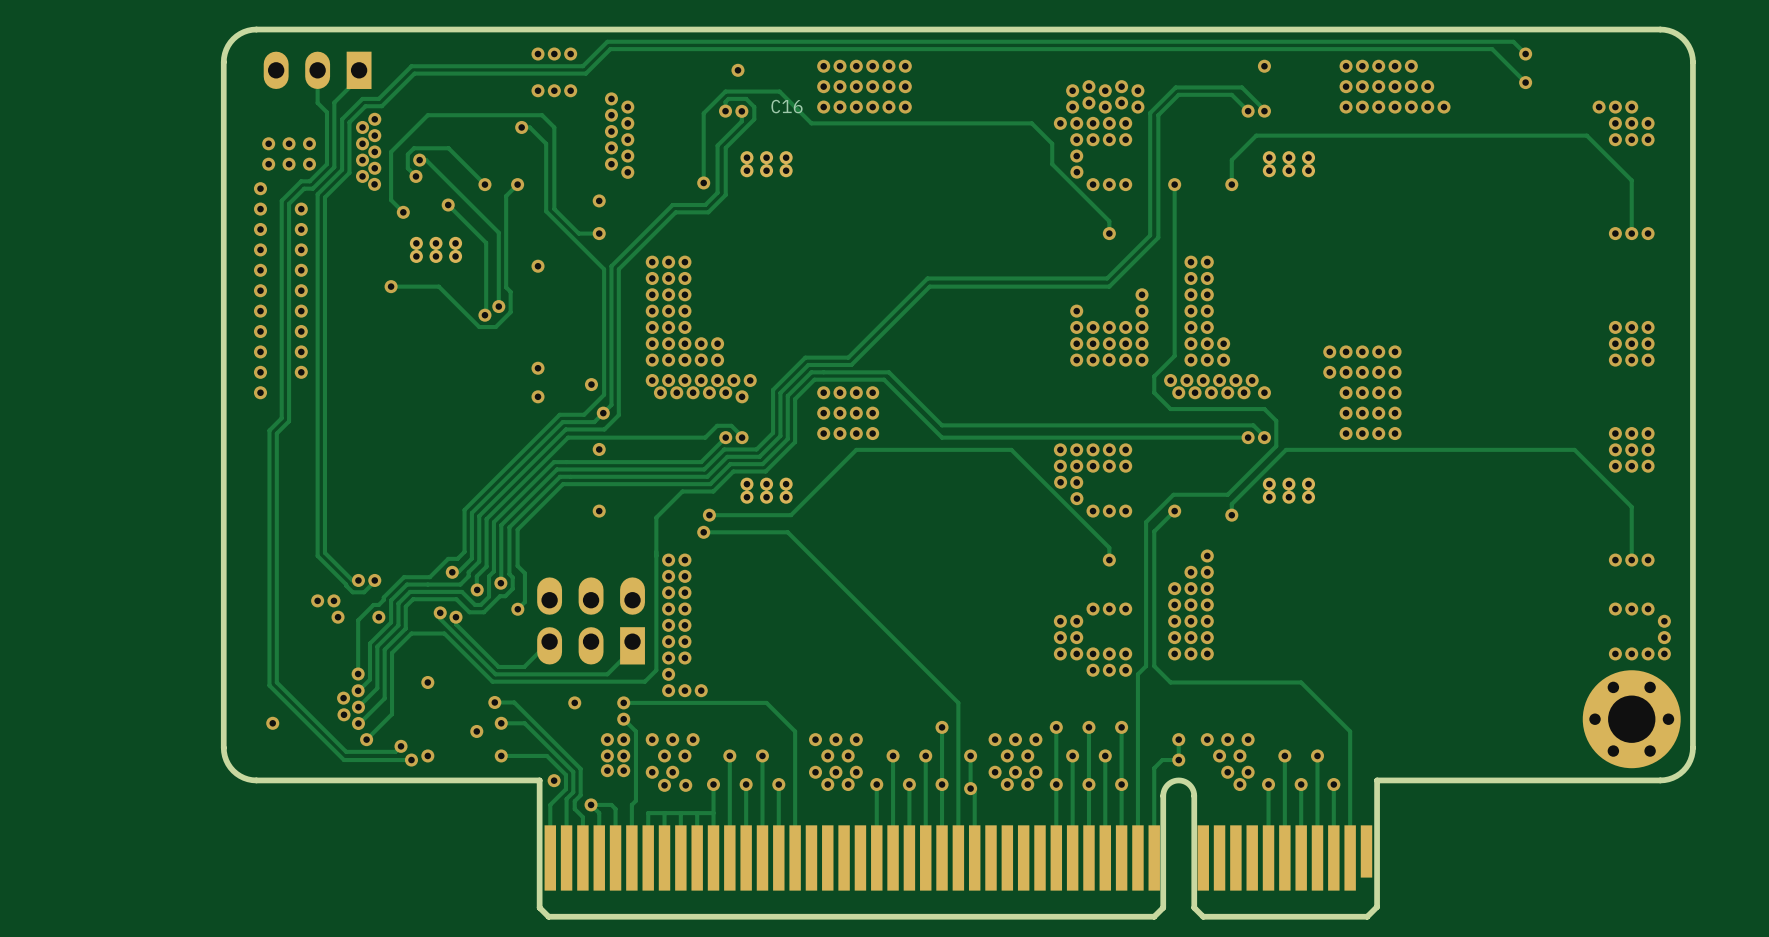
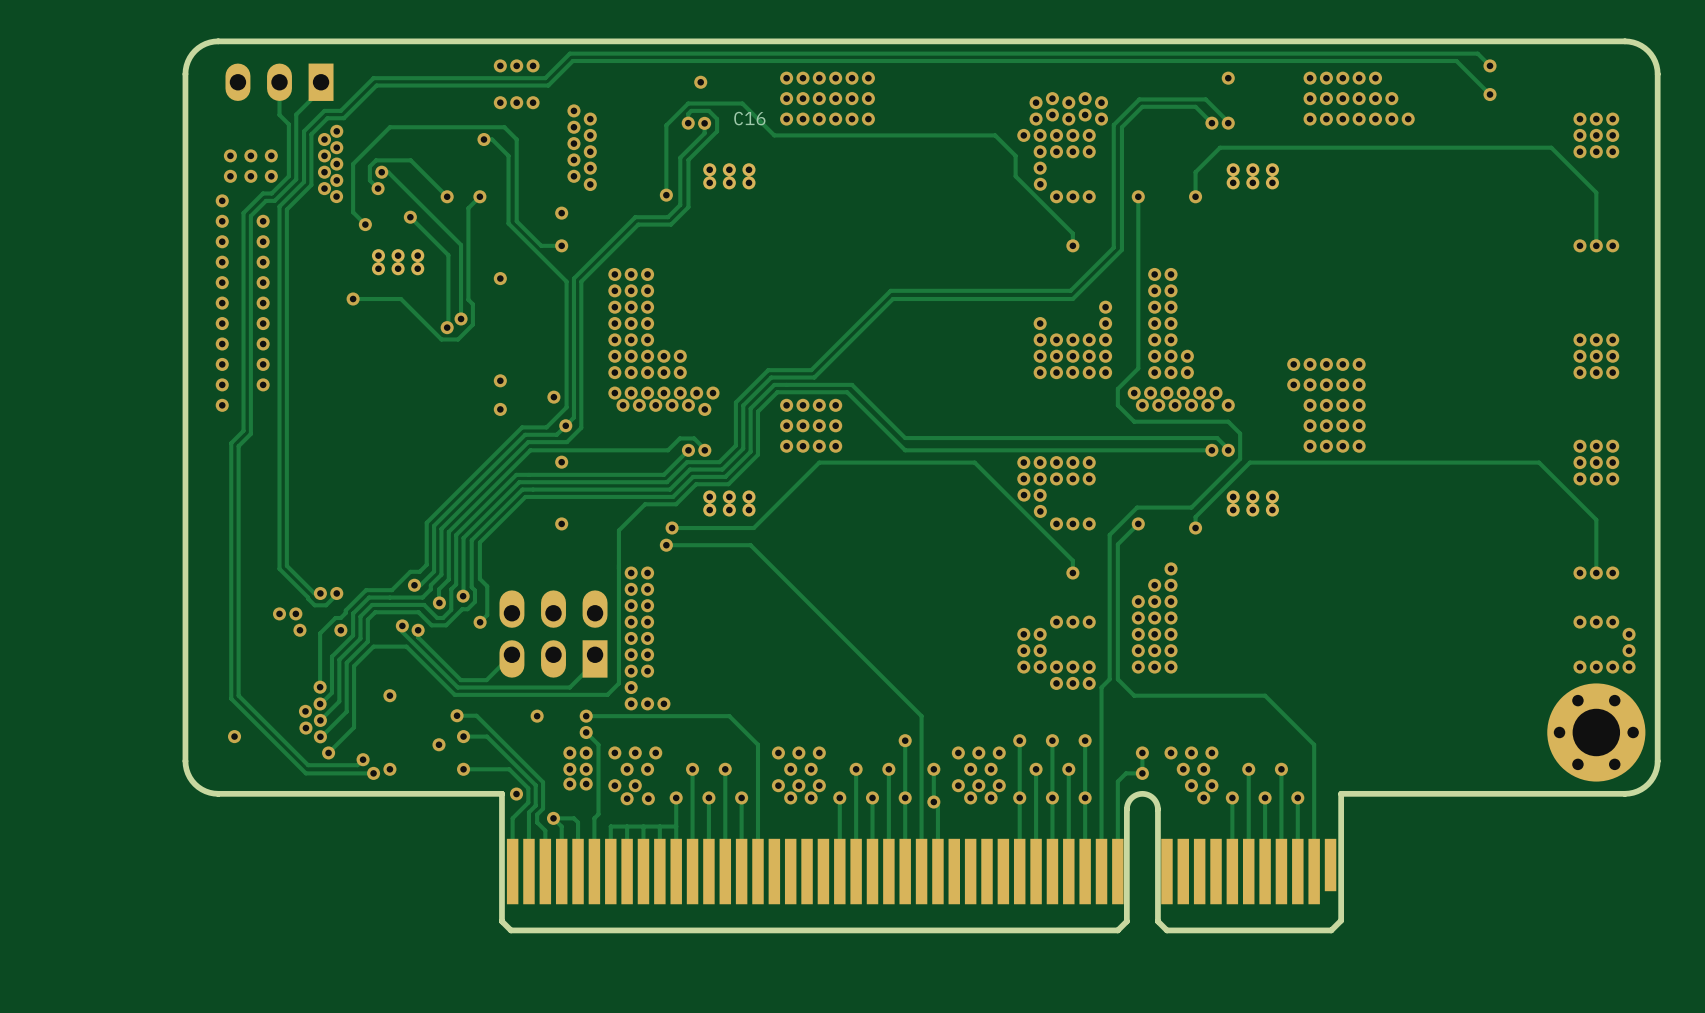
via position: (1599, 107) -> (1612, 119)

